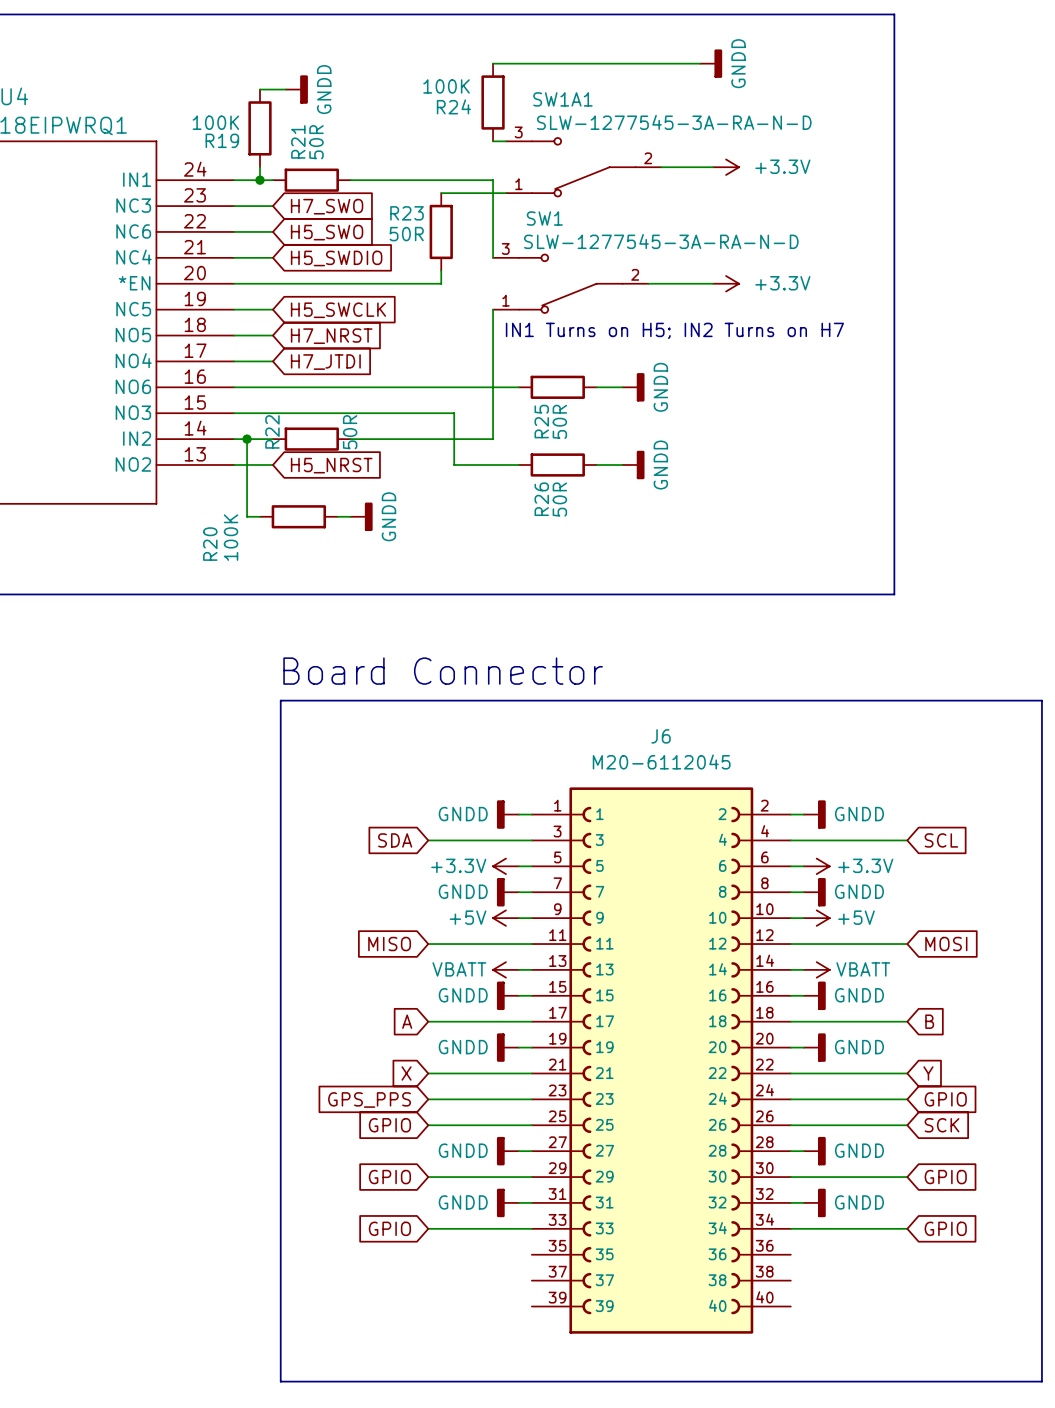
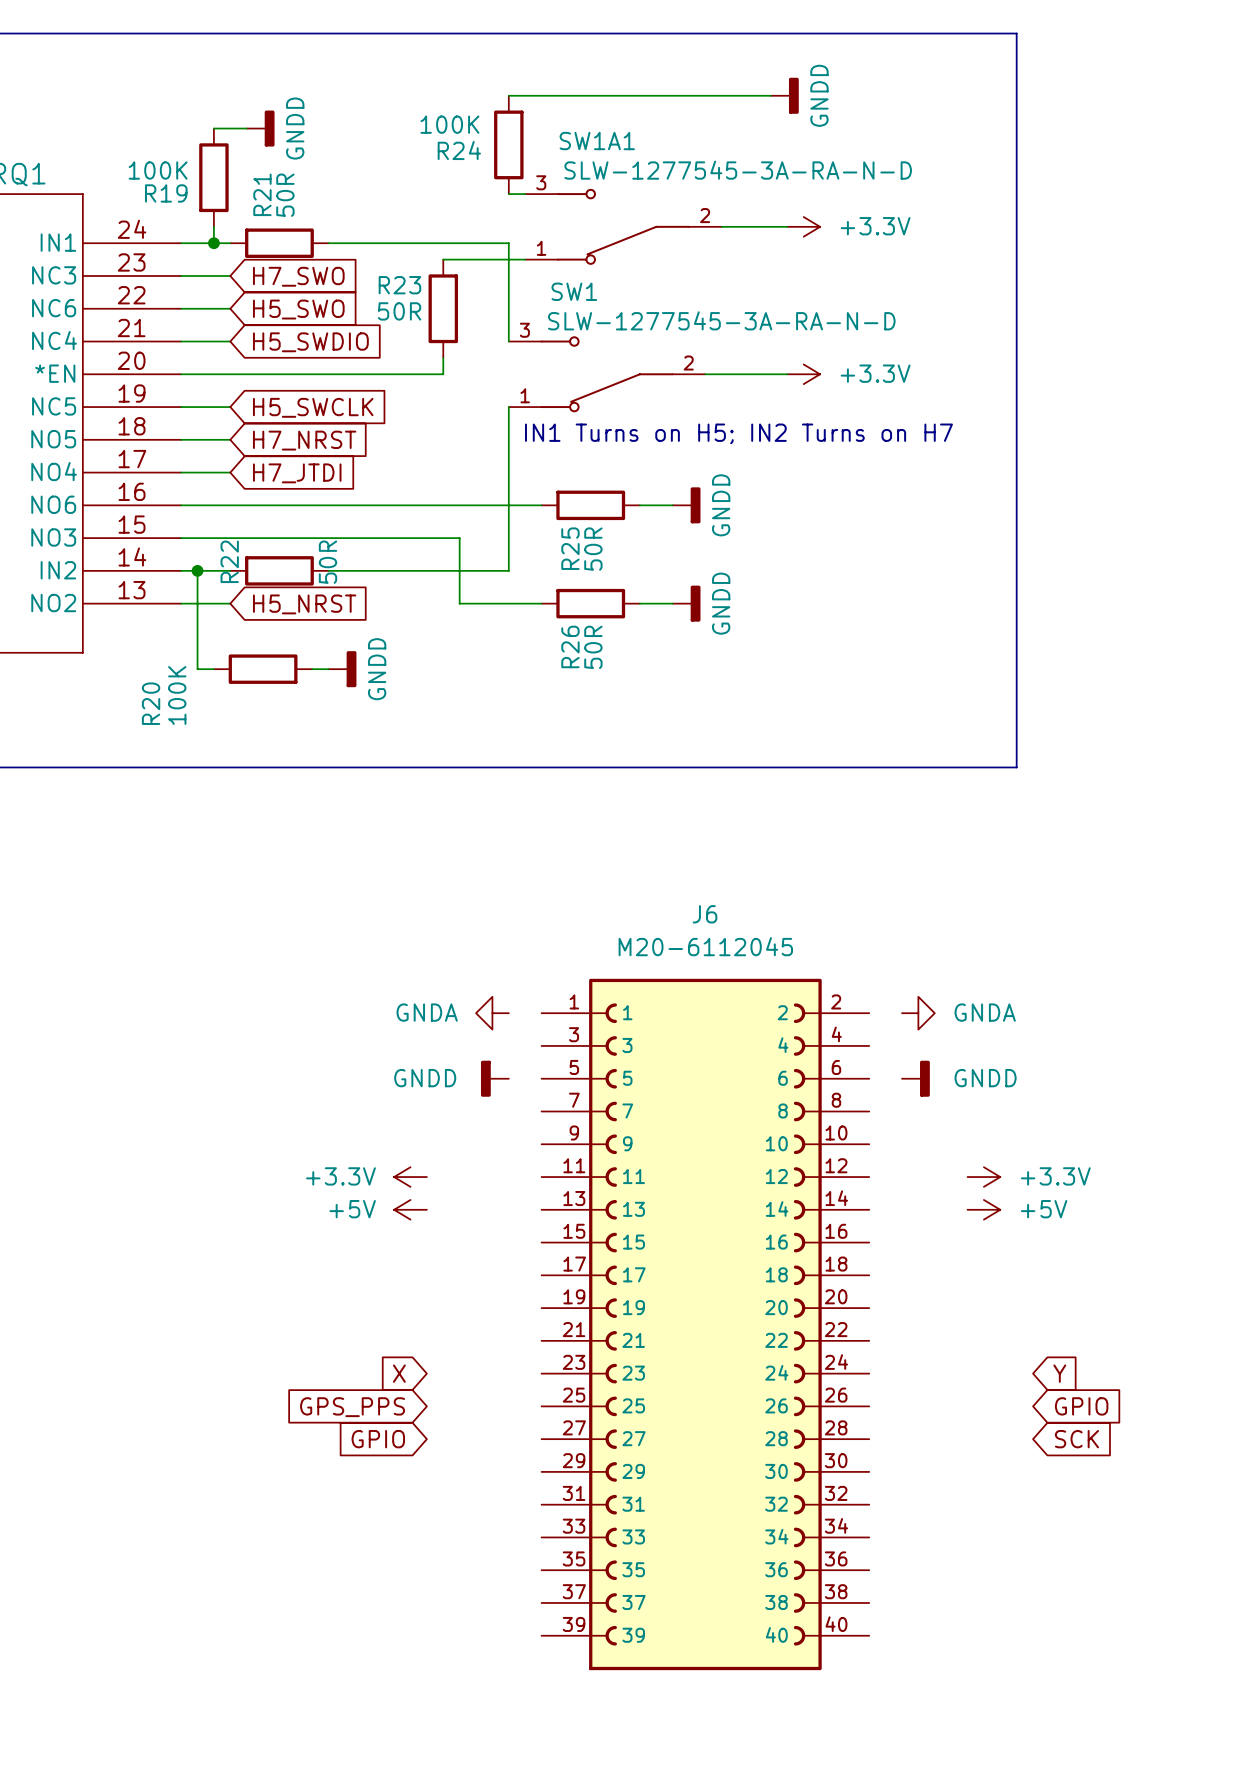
text: Board Connector (443, 671) -> none
line: (280, 700) (1041, 700) (1041, 1381) (280, 1381) (280, 700) -> none
power symbol: none -> GNDA (492, 1013)
power symbol: none -> GNDA (918, 1013)
power symbol: GNDD (507, 814) -> none
wire: (790, 814) (803, 814) -> none
power symbol: GNDD (814, 814) -> none
global label: SDA (395, 840) -> none
wire: (428, 840) (531, 840) -> none
power symbol: none -> GNDD (494, 1078)
wire: (790, 840) (907, 840) -> none
power symbol: none -> GNDD (915, 1078)
global label: SCL (941, 840) -> none
power symbol text position: +3.3V (458, 865) -> +3.3V (340, 1176)
power symbol text position: +3.3V (865, 865) -> +3.3V (1055, 1176)
power symbol position: +3.3V (505, 866) -> +3.3V (410, 1177)
wire: (790, 866) (803, 866) -> none
power symbol position: +3.3V (816, 866) -> +3.3V (983, 1177)
power symbol: GNDD (507, 892) -> none
wire: (790, 892) (803, 892) -> none
power symbol: GNDD (814, 892) -> none
power symbol text position: +5V (468, 917) -> +5V (352, 1209)
power symbol text position: +5V (856, 917) -> +5V (1044, 1209)
power symbol position: +5V (505, 918) -> +5V (410, 1209)
wire: (790, 918) (803, 918) -> none
power symbol position: +5V (816, 918) -> +5V (983, 1209)
global label: MISO (389, 944) -> none
wire: (428, 944) (531, 944) -> none
wire: (790, 944) (907, 944) -> none
global label: MOSI (946, 944) -> none
power symbol: VBATT (505, 969) -> none
wire: (790, 969) (803, 969) -> none
power symbol: VBATT (816, 969) -> none
power symbol: GNDD (507, 995) -> none
wire: (790, 995) (803, 995) -> none
power symbol: GNDD (814, 995) -> none
global label: A (407, 1021) -> none
wire: (428, 1021) (531, 1021) -> none
wire: (790, 1021) (907, 1021) -> none
global label: B (929, 1021) -> none
power symbol: GNDD (507, 1047) -> none
wire: (790, 1047) (803, 1047) -> none
power symbol: GNDD (814, 1047) -> none
J6 position: (661, 1060) -> (705, 1324)
wire: (428, 1073) (531, 1073) -> none
wire: (790, 1073) (907, 1073) -> none
wire: (428, 1099) (531, 1099) -> none
wire: (790, 1099) (907, 1099) -> none
wire: (428, 1125) (531, 1125) -> none
wire: (790, 1125) (907, 1125) -> none
power symbol: GNDD (507, 1151) -> none
wire: (790, 1151) (803, 1151) -> none
power symbol: GNDD (814, 1151) -> none
global label: GPIO (389, 1177) -> none
wire: (428, 1177) (531, 1177) -> none
wire: (790, 1177) (907, 1177) -> none
global label: GPIO (945, 1177) -> none
power symbol: GNDD (507, 1202) -> none
wire: (790, 1202) (803, 1202) -> none
power symbol: GNDD (814, 1202) -> none
global label: GPIO (389, 1228) -> none
wire: (428, 1228) (531, 1228) -> none
wire: (790, 1228) (907, 1228) -> none
global label: GPIO (945, 1228) -> none

